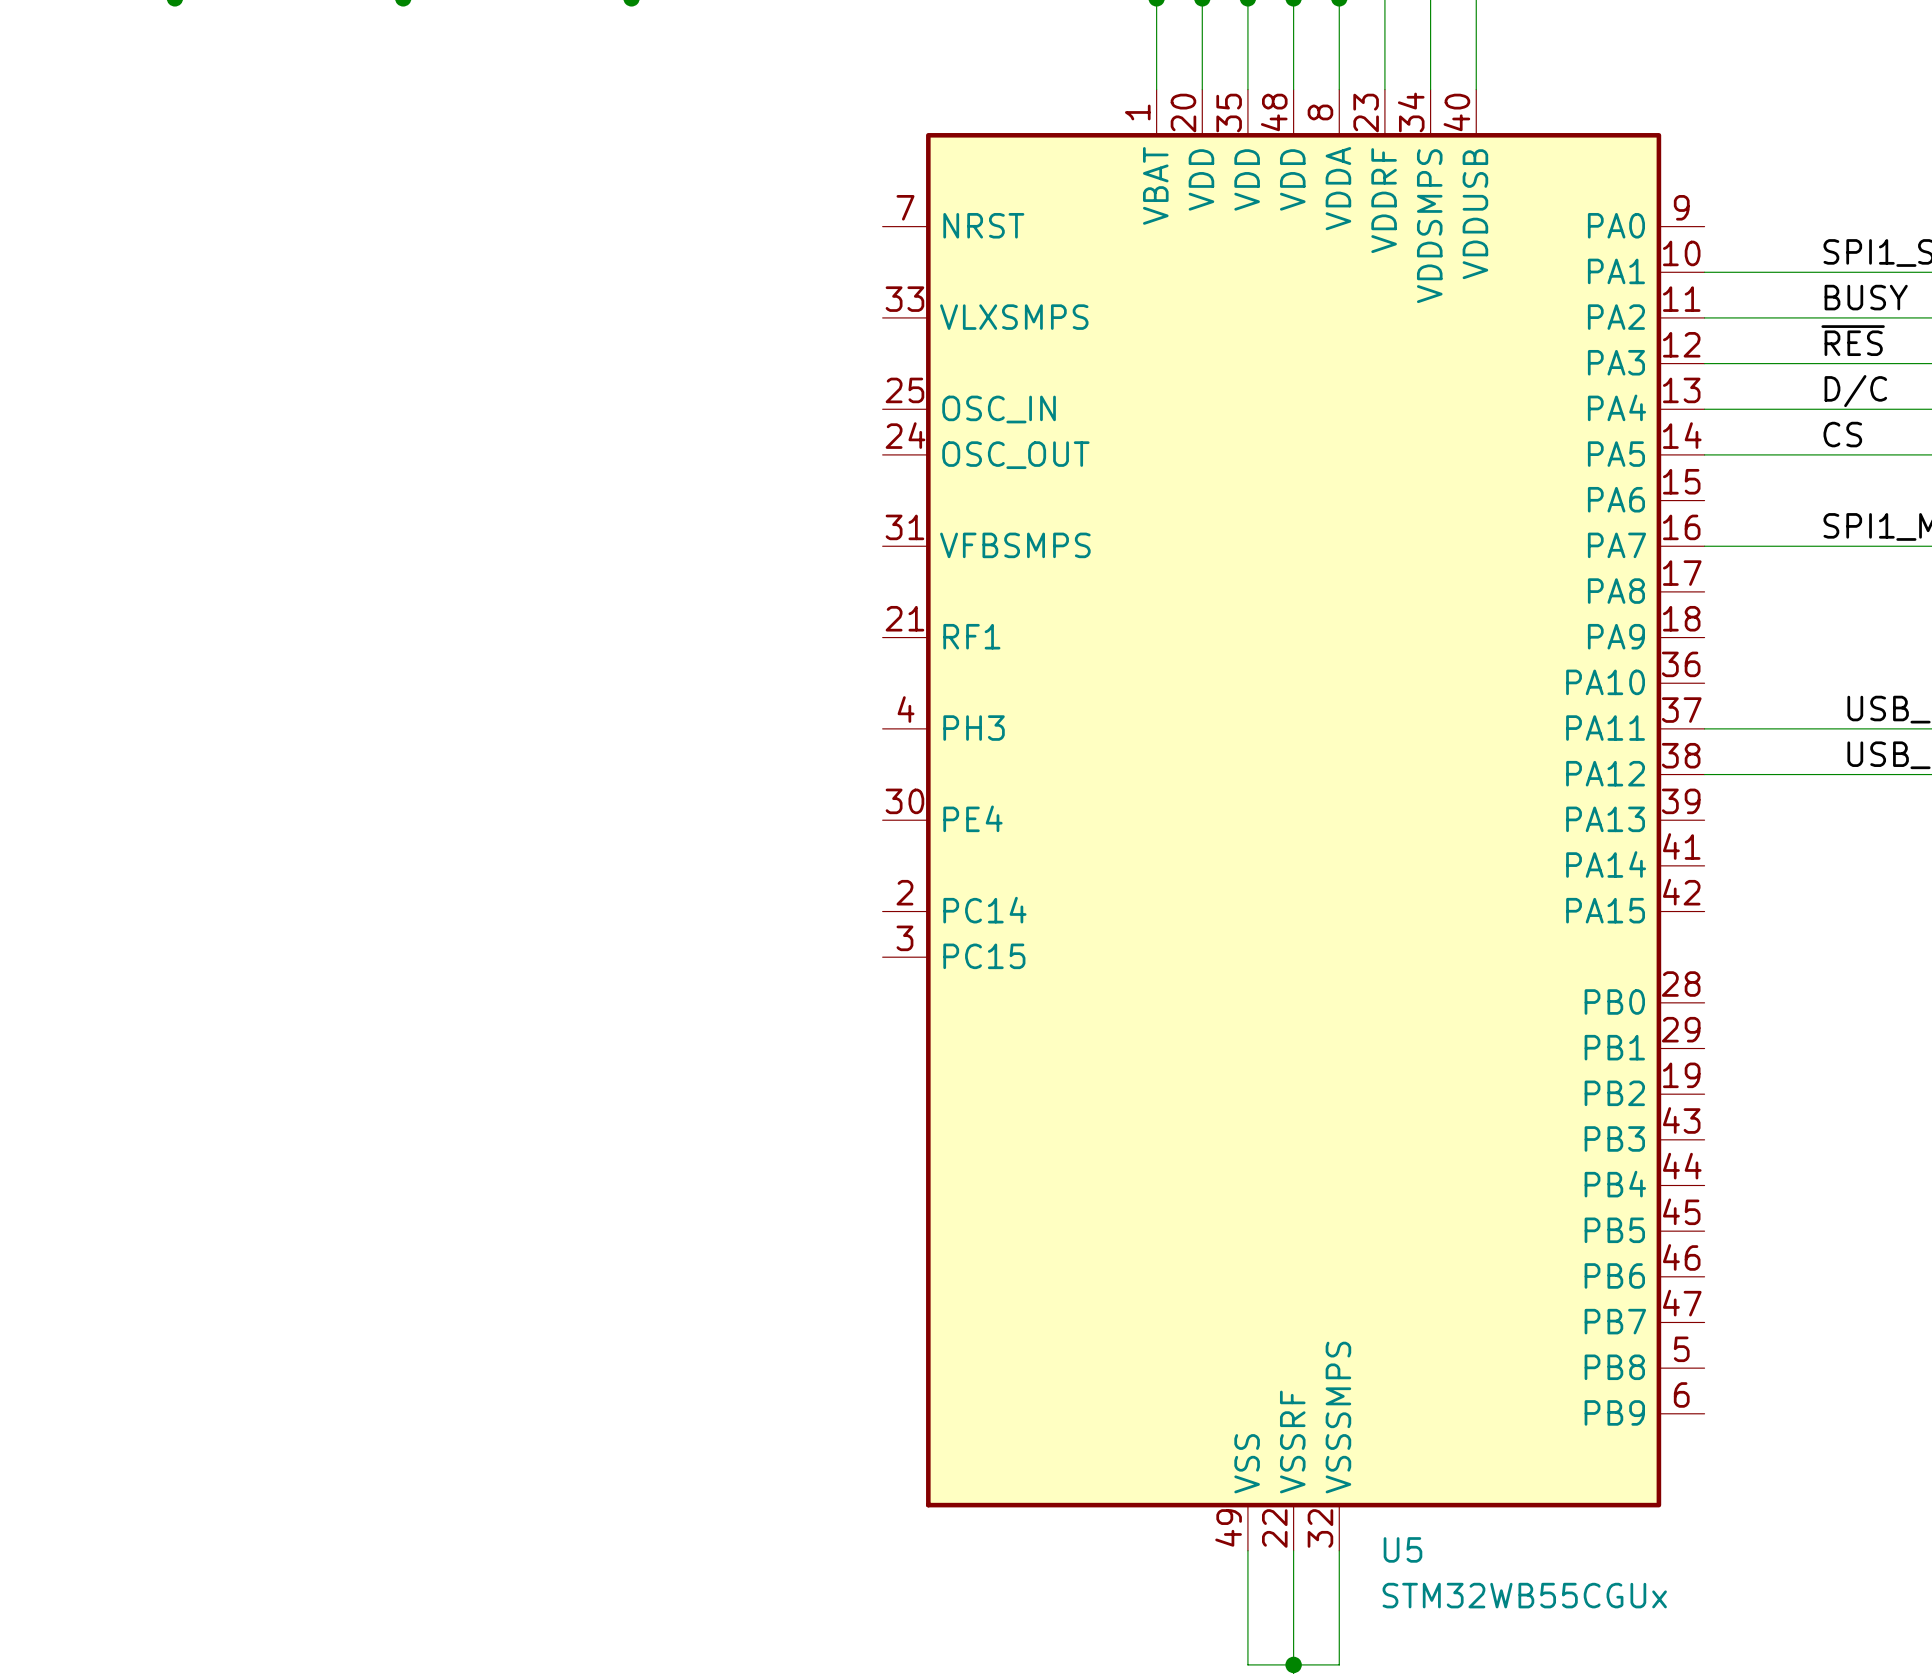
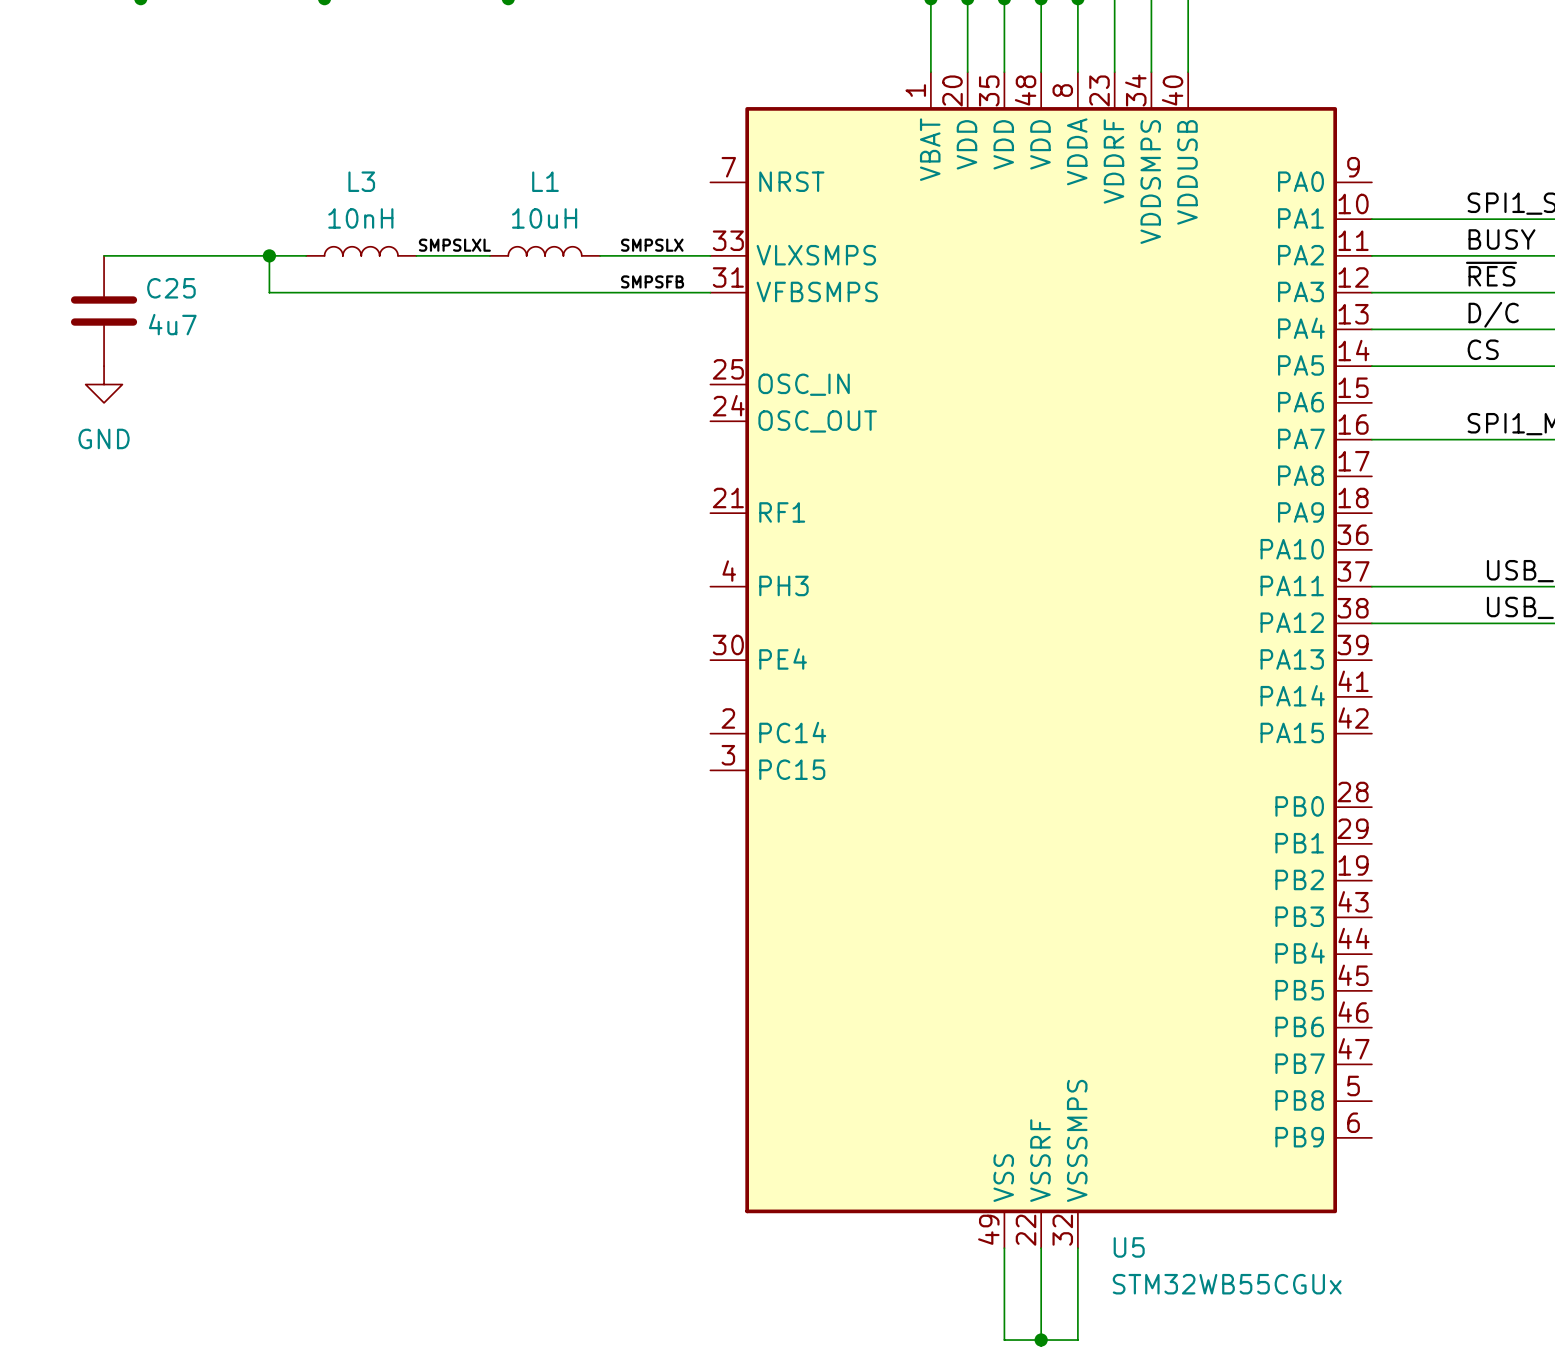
U5 symbol: [882, 89, 1705, 1551] -> [710, 72, 1372, 1249]
label: none -> SMPSLXL (454, 245)
label: none -> SMPSLX (652, 245)
L3: none -> 10nH (361, 251)
L1: none -> 10uH (545, 251)
wire: none -> (104, 255) (306, 255)
wire: none -> (269, 255) (269, 292) (710, 292)
junction: none -> (269, 255)
wire: none -> (416, 255) (489, 255)
wire: none -> (600, 255) (710, 255)
label: none -> SMPSFB (652, 281)
C25: none -> 4u7 (104, 311)
power symbol: none -> GND (104, 384)

